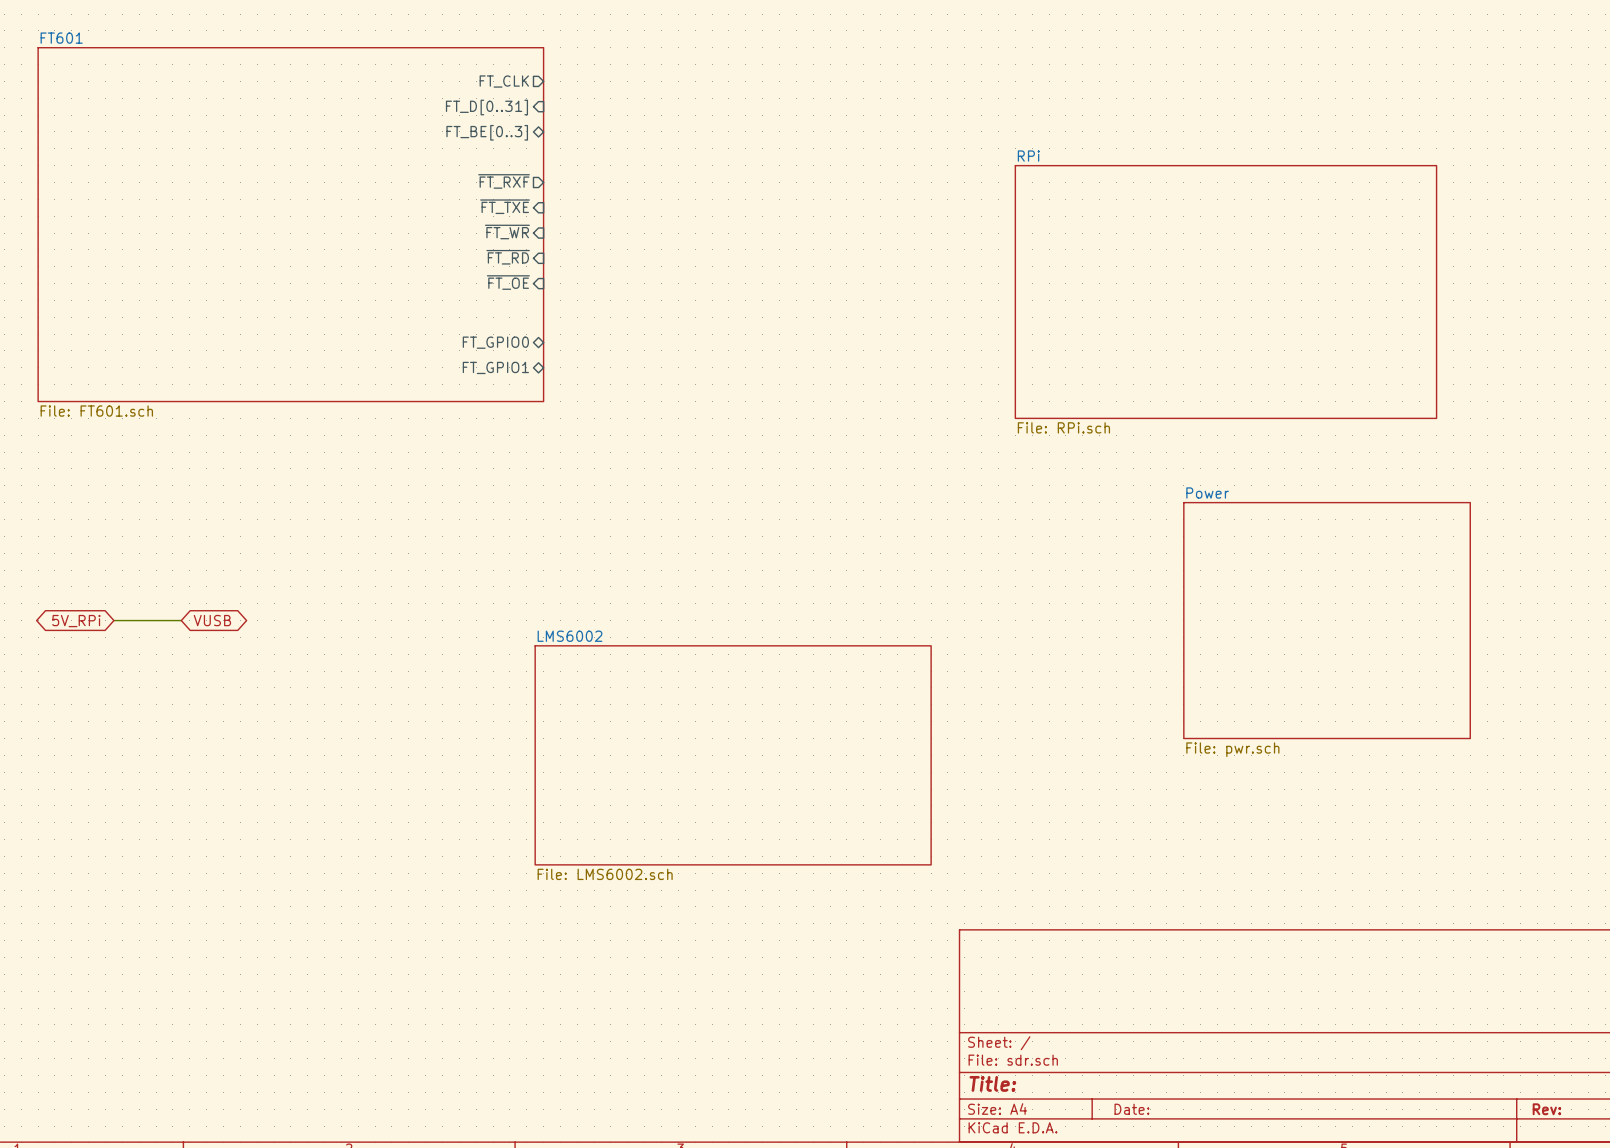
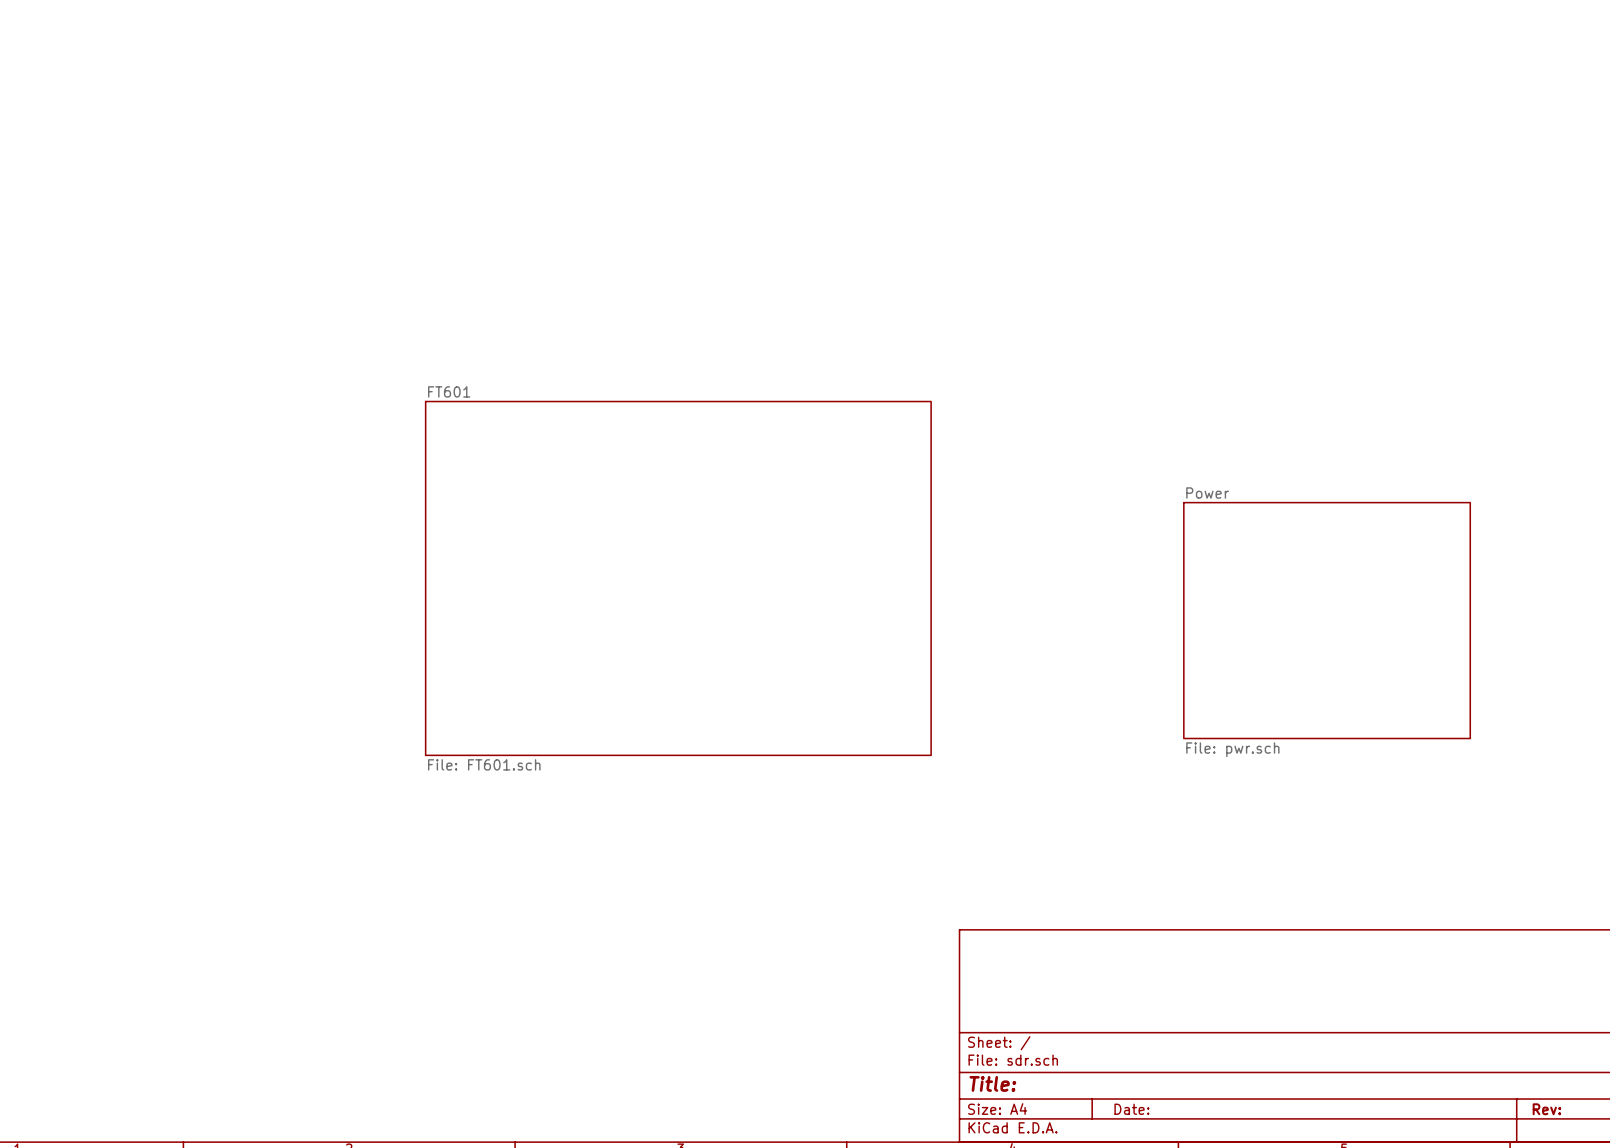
sheet pin: FT_CLK (504, 81) -> none
sheet pin: FT_D[0..31] (486, 107) -> none
sheet pin: FT_BE[0..3] (487, 132) -> none
sheet pin: ~{FT_RXF} (504, 181) -> none
sheet pin: ~{FT_TXE} (505, 206) -> none
sheet FT601 position: (290, 224) -> (678, 578)
sheet pin: ~{FT_WR} (507, 231) -> none
sheet pin: ~{FT_RD} (508, 257) -> none
sheet pin: ~{FT_OE} (508, 282) -> none
sheet RPi: File: RPi.sch (1225, 292) -> none
sheet pin: FT_GPIO0 (495, 342) -> none
sheet pin: FT_GPIO1 (495, 367) -> none
wire: (113, 620) (181, 620) -> none
global label: VUSB (212, 620) -> none
global label: 5V_RPi (76, 621) -> none
sheet LMS6002: File: LMS6002.sch (733, 755) -> none

